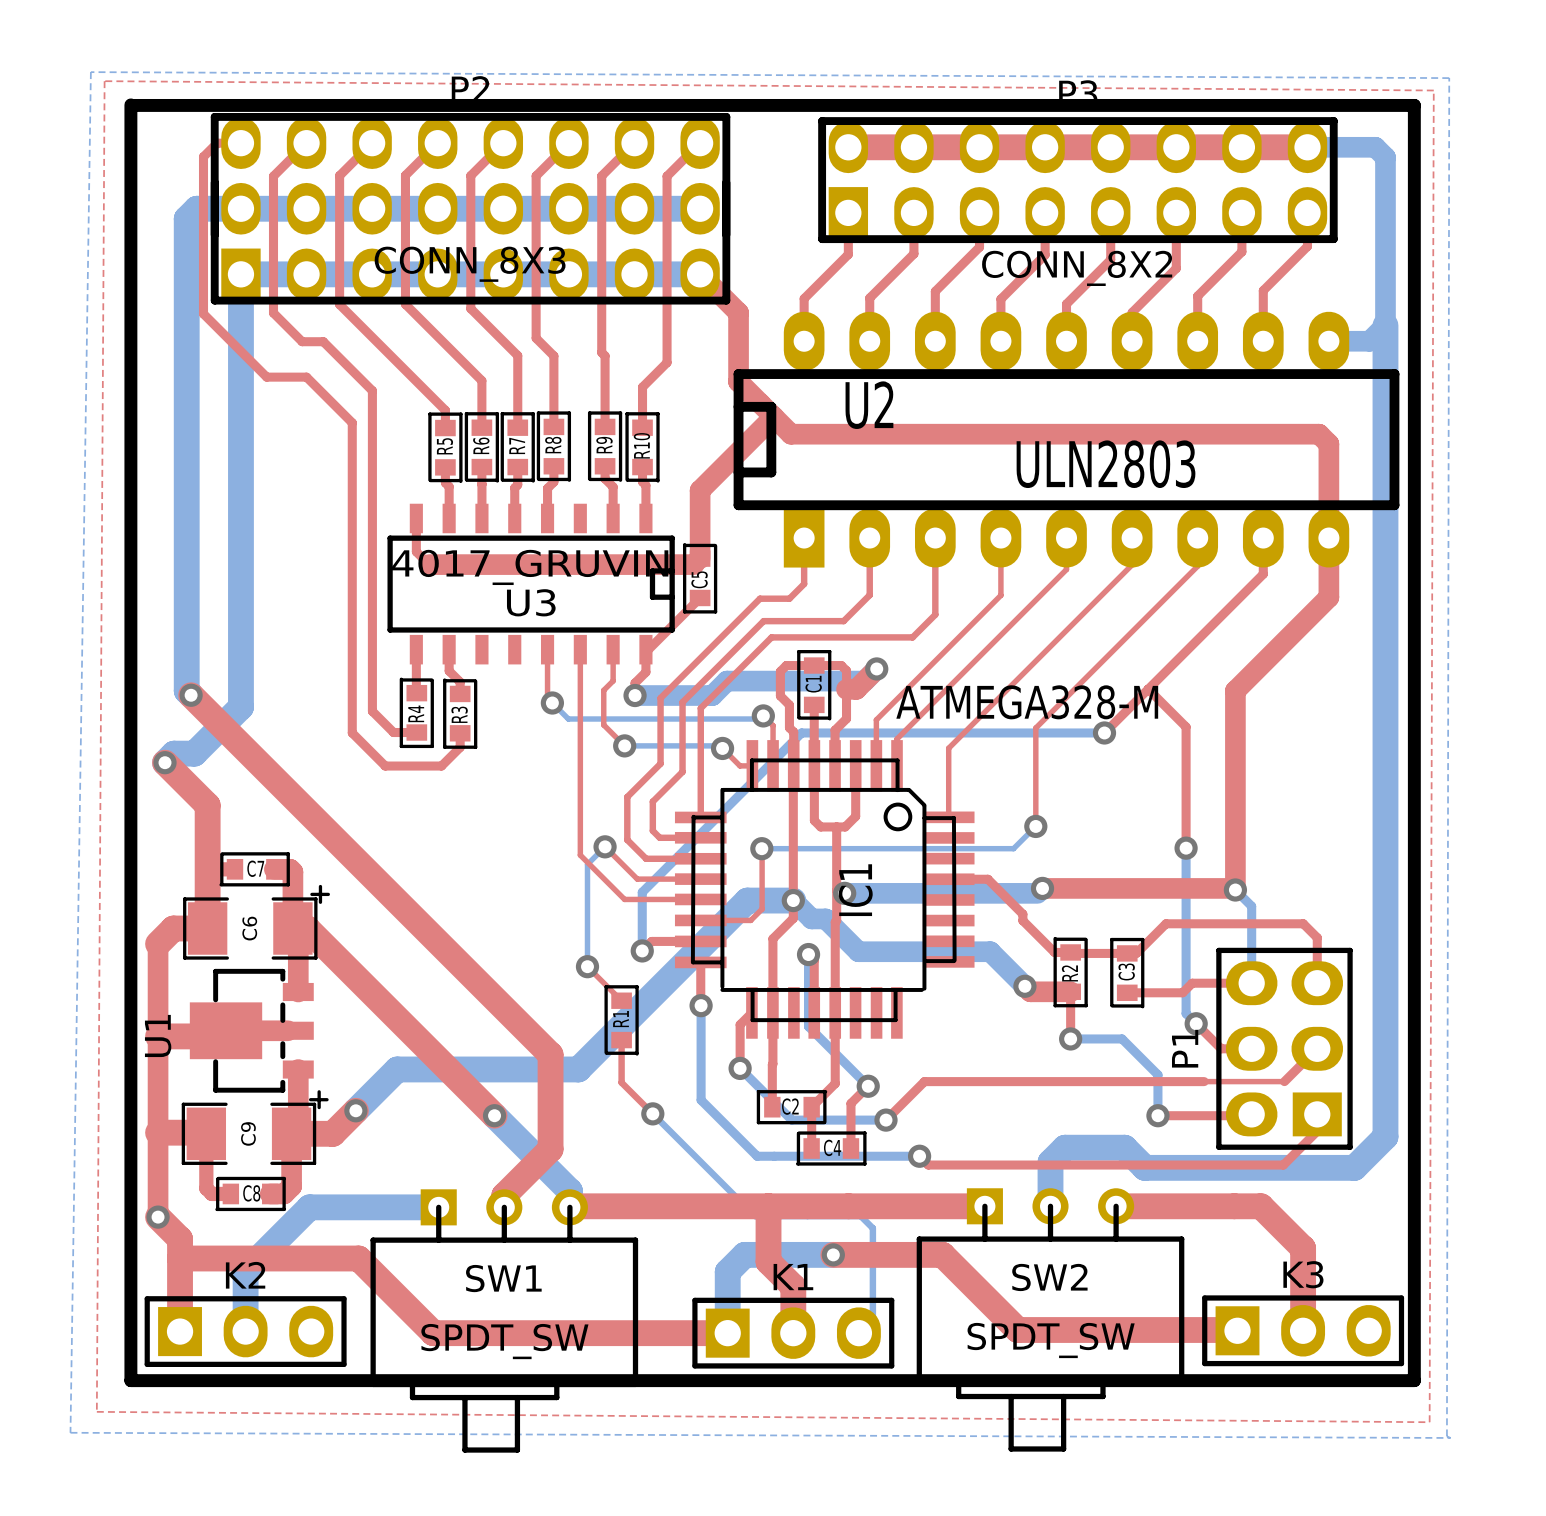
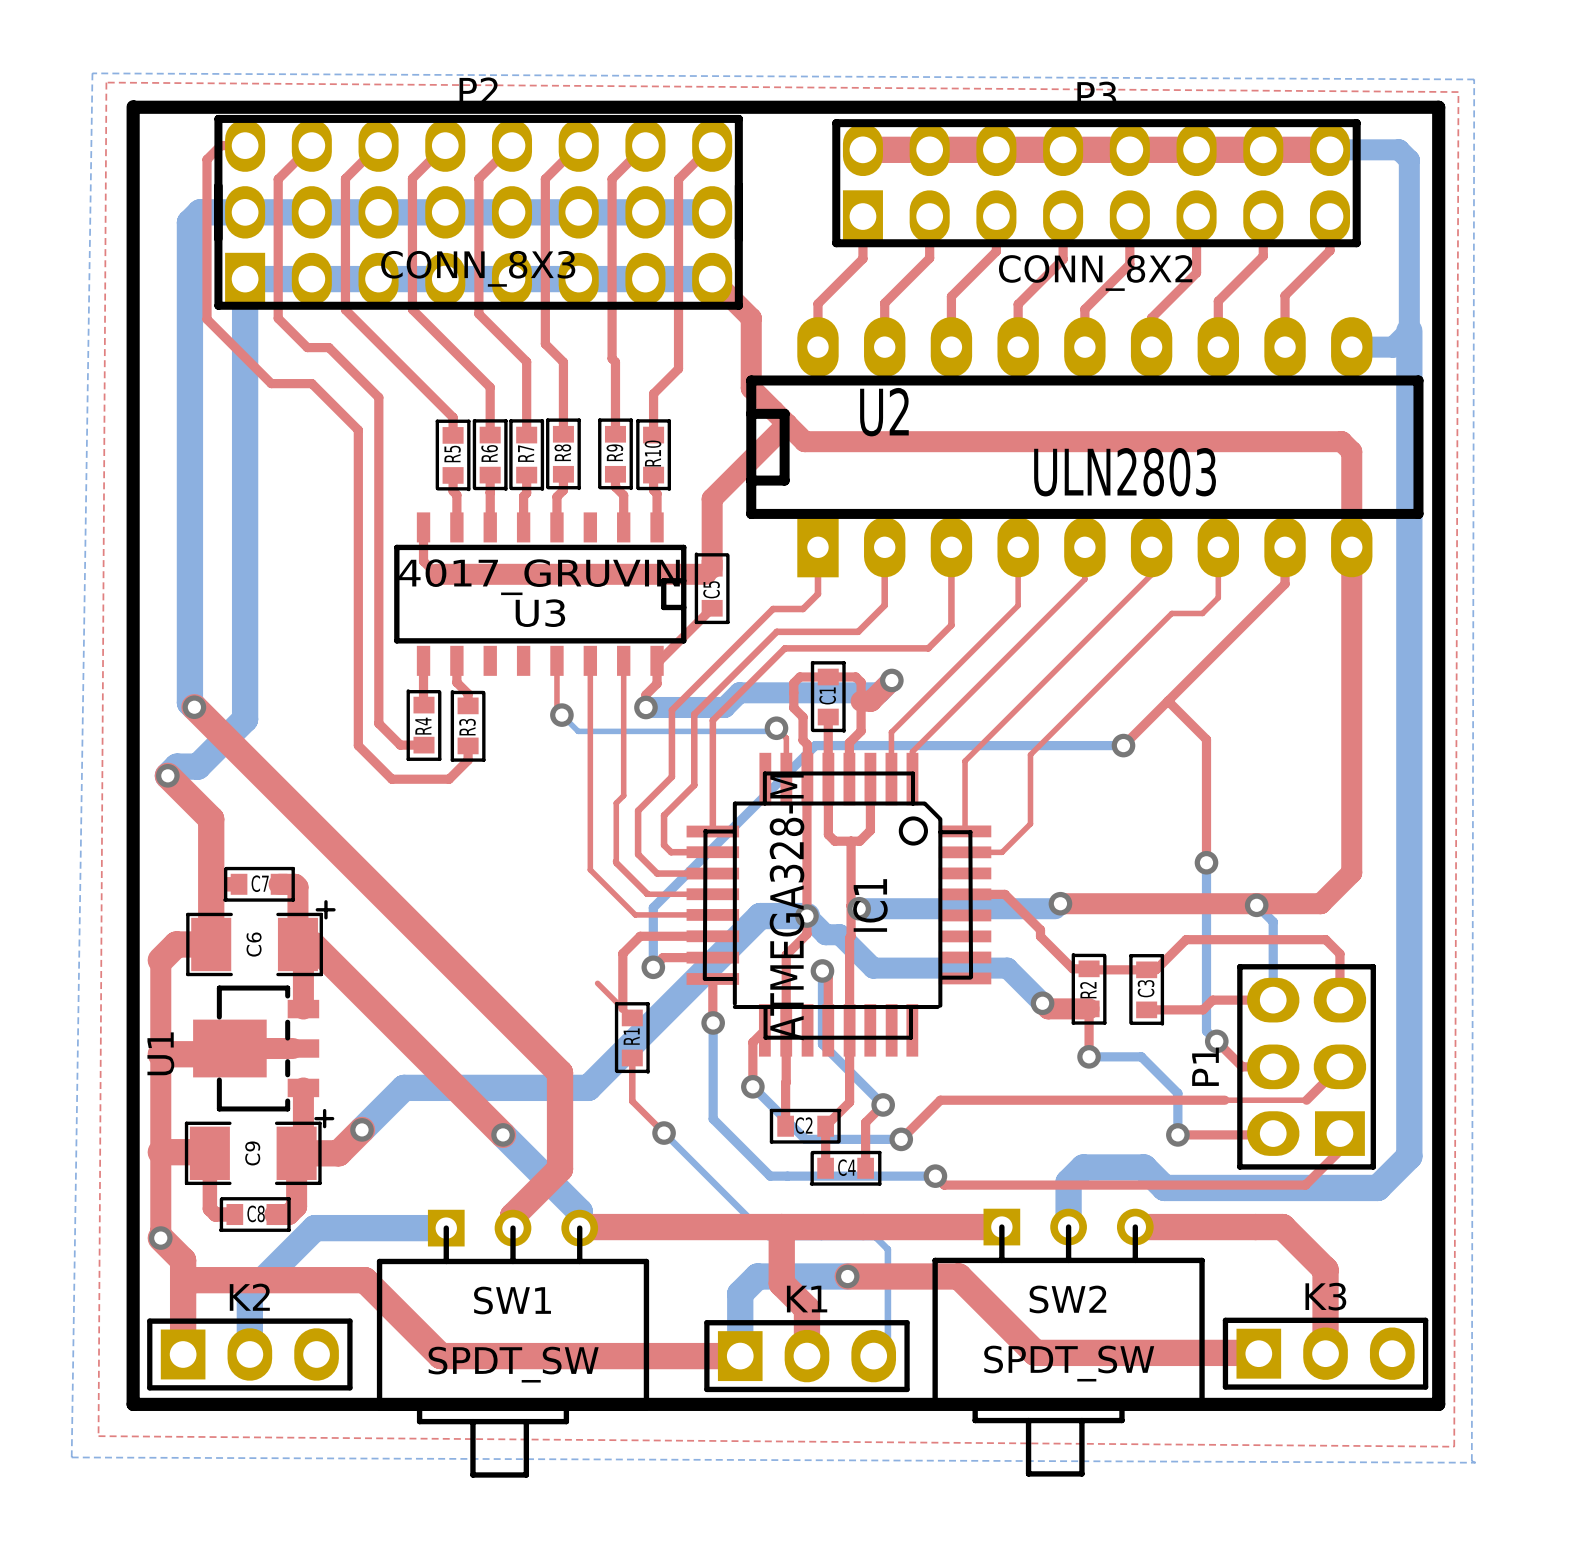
top track: (1197, 566) (1035, 728) (1035, 826) -> (1218, 575) (1218, 597) (1202, 613) (1171, 613) (1030, 754) (1030, 823) (1002, 852) (965, 852)
top track: (1328, 597) (1235, 690) (1235, 890) -> (1351, 607) (1351, 872) (1320, 903) (1256, 903)
top track: (613, 680) (603, 690) (603, 724) (624, 745) -> (623, 692) (623, 795) (616, 803) (616, 863) (648, 894)
IC1 value rotation: 0° (1027, 702) -> 90° counterclockwise (787, 907)
bottom track: (624, 745) (719, 745) (722, 748) -> none
via: (624, 745) -> none
top track: (722, 748) (739, 765) (752, 765) -> none
via: (722, 748) -> none
bottom track: (1035, 826) (1013, 848) (761, 848) -> none
via: (1035, 826) -> none
bottom track: (605, 846) (587, 864) (587, 966) -> none
via: (605, 846) -> none
via: (761, 848) -> none
top track: (762, 848) (762, 909) (750, 920) (700, 920) -> (622, 1008) (622, 953) (640, 936) (712, 936)
via: (587, 966) -> none

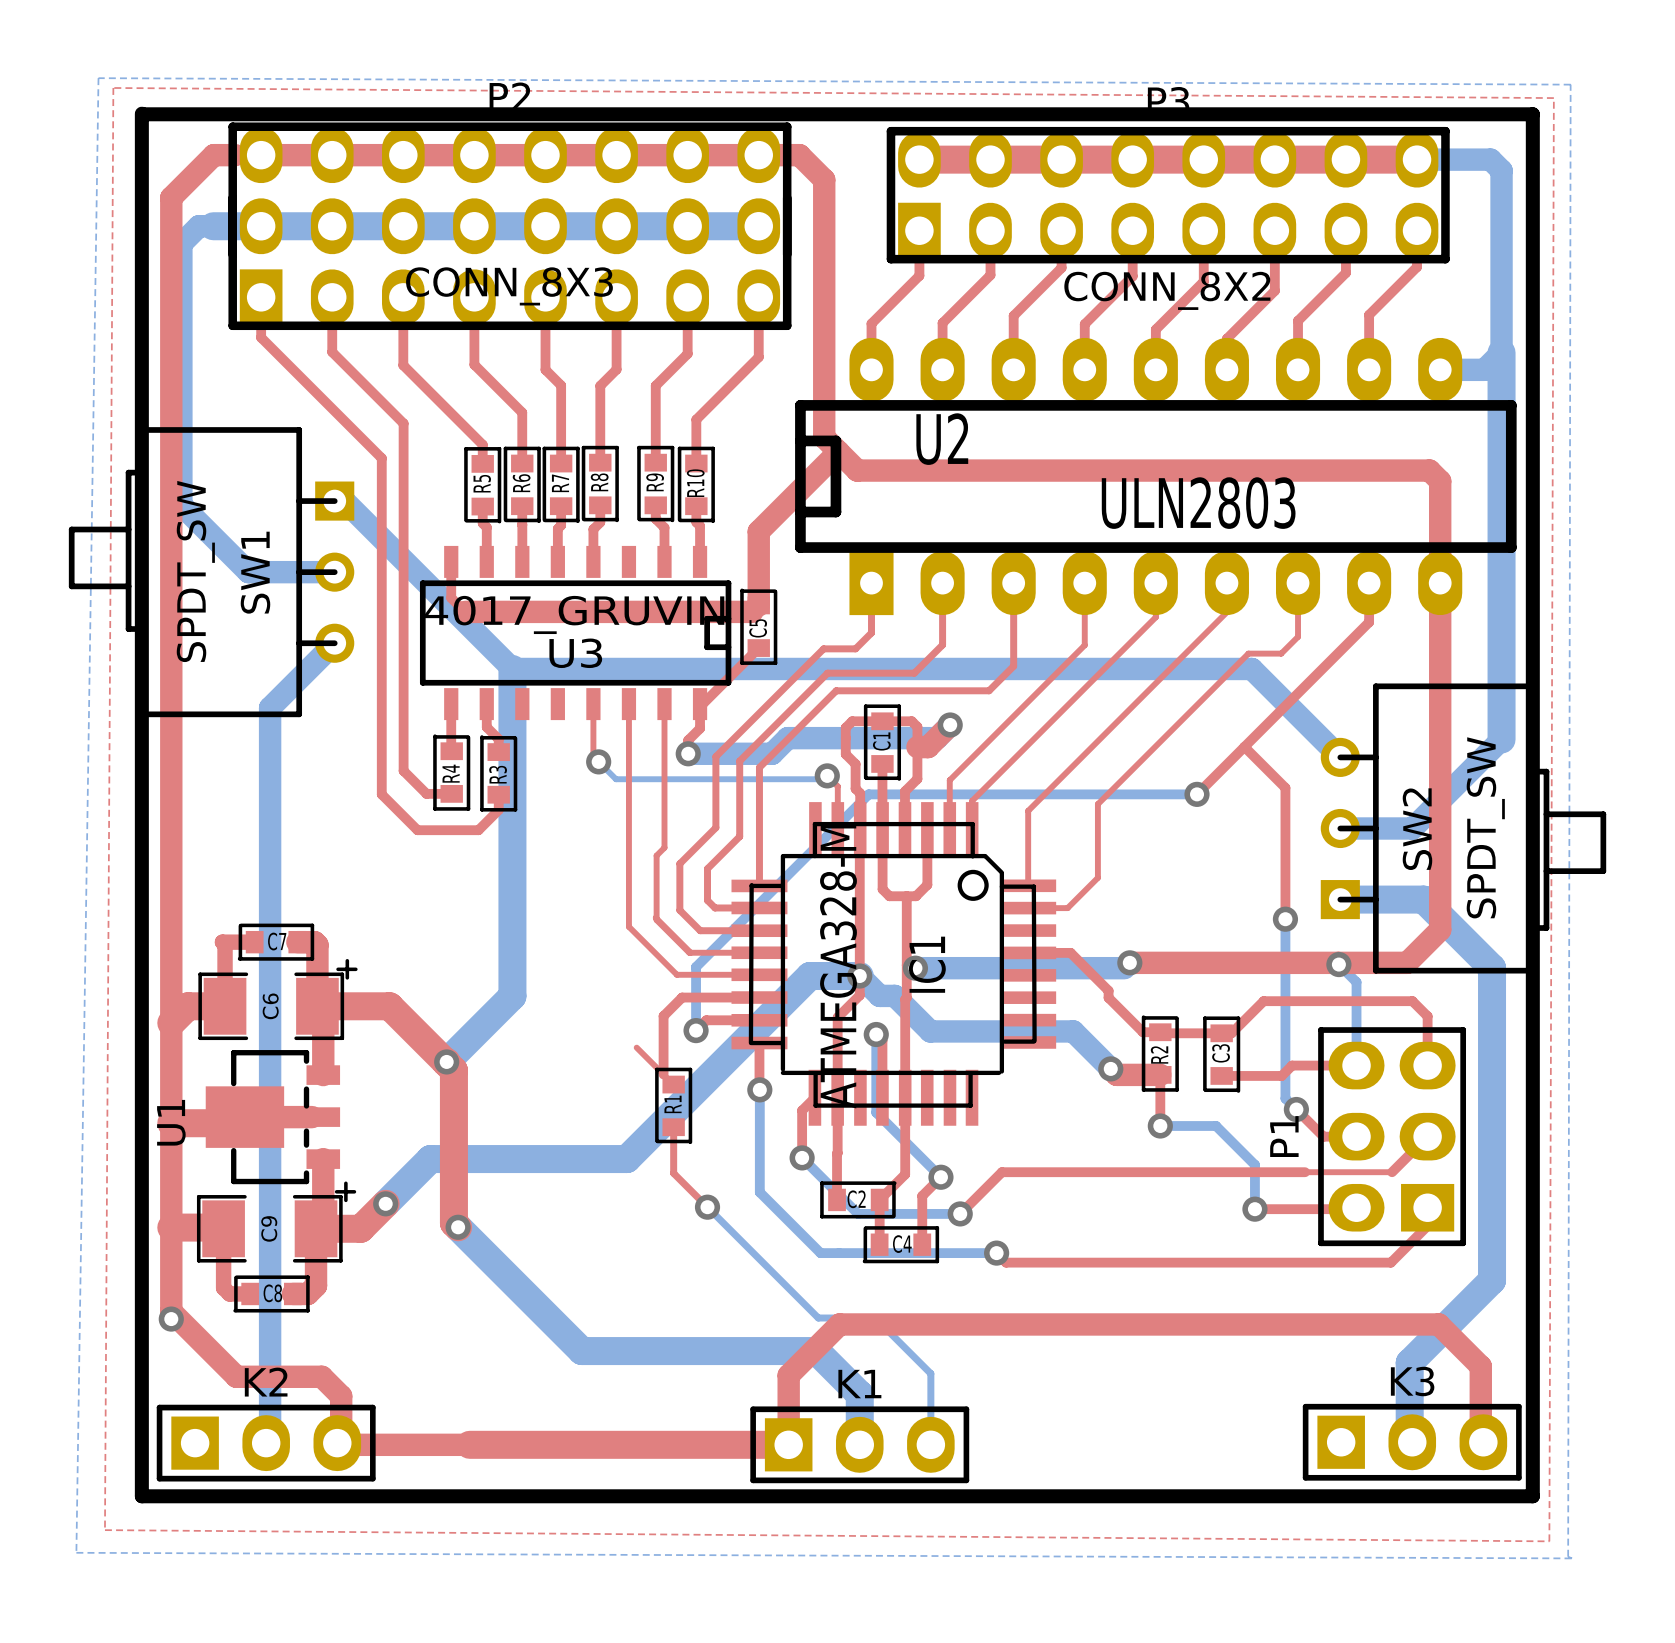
top track: (220, 145) (207, 159) (207, 319) (271, 383) (311, 383) -> (261, 297) (261, 337) (332, 408)
top track: none -> (235, 155) (213, 155) (171, 197) (171, 1022)
top track: none -> (261, 155) (799, 155) (824, 179) (824, 437)
top track: (311, 145) (278, 179) (278, 318) (307, 347) (328, 347) -> (332, 297) (332, 352) (350, 370)
top track: (378, 145) (345, 178) (345, 309) (378, 342) -> (403, 297) (403, 365)
top track: (445, 145) (412, 178) (412, 309) (445, 342) -> (474, 297) (474, 364)
top track: (511, 145) (478, 178) (478, 314) (511, 347) -> (545, 297) (545, 369)
top track: (578, 145) (545, 178) (545, 344) (563, 362) -> (616, 297) (616, 369) (600, 385)
top track: (645, 145) (612, 178) (612, 358) (615, 362) -> (687, 297) (687, 353) (655, 385)
top track: (712, 145) (678, 179) (678, 368) -> none
bottom track: (200, 212) (189, 222) (189, 702) (194, 707) -> (213, 226) (198, 226) (181, 243) (181, 505) (248, 572) (334, 572)
bottom track: (712, 279) (245, 279) (245, 719) (197, 766) (177, 766) (167, 775) -> none
top track: (712, 279) (751, 318) (751, 388) (773, 410) -> (758, 297) (758, 357) (722, 393)
bottom track: none -> (334, 501) (344, 501) (512, 668)
bottom track: none -> (334, 643) (270, 707) (270, 1444)
bottom track: none -> (512, 668) (1251, 668) (1340, 757)
bottom track: none -> (512, 668) (512, 996) (446, 1061)
bottom track: (1409, 694) (1409, 1156) (1377, 1187) (1164, 1187) (1144, 1167) (1083, 1167) (1068, 1182) (1068, 1227) -> (1501, 739) (1412, 828) (1340, 828)
top track: (194, 707) (560, 1072) (560, 1169) (513, 1216) (513, 1228) -> none
via: (194, 707) -> none
top track: (167, 775) (211, 819) (211, 944) -> none
via: (167, 775) -> none
bottom track: none -> (1340, 899) (1423, 899) (1492, 967) (1492, 1280) (1409, 1362) (1409, 1444)
top track: (312, 944) (503, 1134) -> (333, 1006) (389, 1006) (453, 1070) (453, 1223) (458, 1227)
via: none -> (446, 1061)
bottom track: (503, 1134) (579, 1211) (579, 1228) -> none
via position: (503, 1134) -> (458, 1227)
bottom track: none -> (458, 1227) (581, 1351) (816, 1351) (859, 1394) (859, 1444)
top track: (781, 1227) (781, 1283) (806, 1308) (806, 1356) -> none
top track: (1001, 1227) (579, 1228) -> none
top track: (1135, 1227) (1282, 1227) (1325, 1269) (1325, 1353) -> none
bottom track: (446, 1228) (314, 1228) (249, 1293) (249, 1354) -> none
bottom track: (821, 1237) (875, 1237) (887, 1249) (887, 1341) (873, 1356) -> (875, 1318) (930, 1373) (930, 1444)
top track: (160, 1238) (183, 1260) (183, 1352) -> none
bottom track: (847, 1276) (757, 1276) (740, 1293) (740, 1356) -> none
top track: (847, 1276) (958, 1276) (1035, 1352) (1258, 1352) -> none
via: (847, 1276) -> none
top track: (183, 1280) (364, 1280) (440, 1356) -> (171, 1311) (236, 1376) (321, 1376) (341, 1396) (341, 1444) (469, 1444)
SW2 rotation: 0° (1068, 1342) -> 90° counterclockwise (1463, 828)
SW2 position: (1068, 1342) -> (1463, 828)
SW1 rotation: 0° (513, 1343) -> 90° clockwise (211, 572)
SW1 position: (513, 1343) -> (211, 572)
top track: none -> (788, 1444) (788, 1375) (839, 1324) (1438, 1324) (1480, 1366) (1480, 1444)

